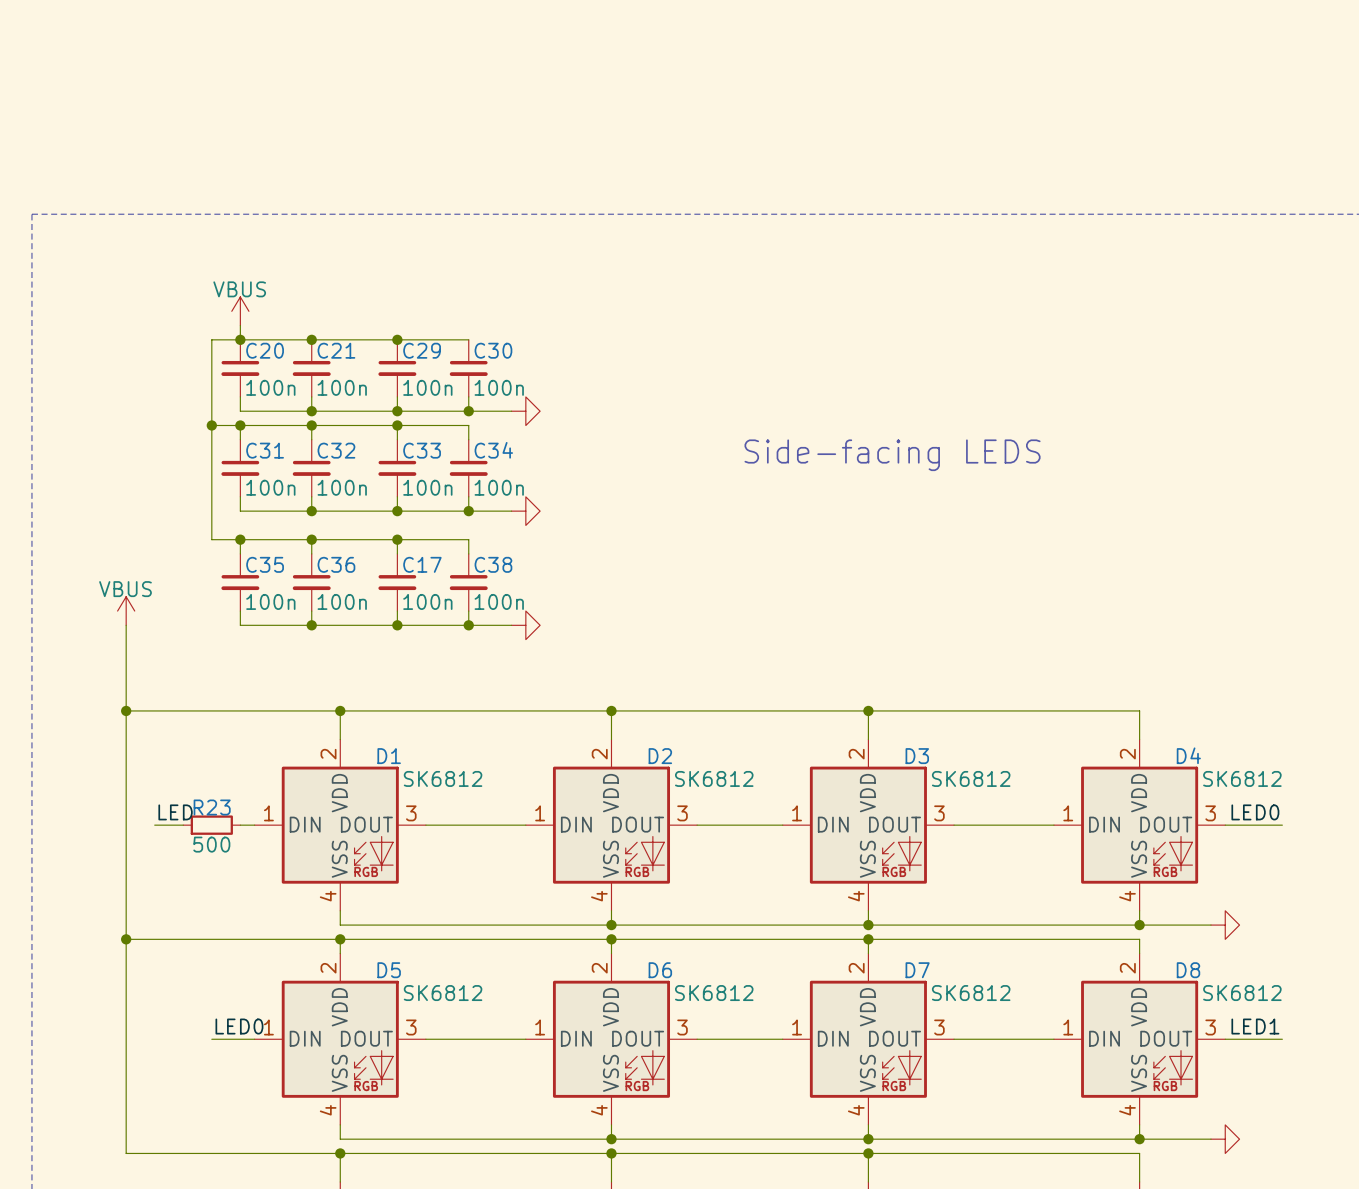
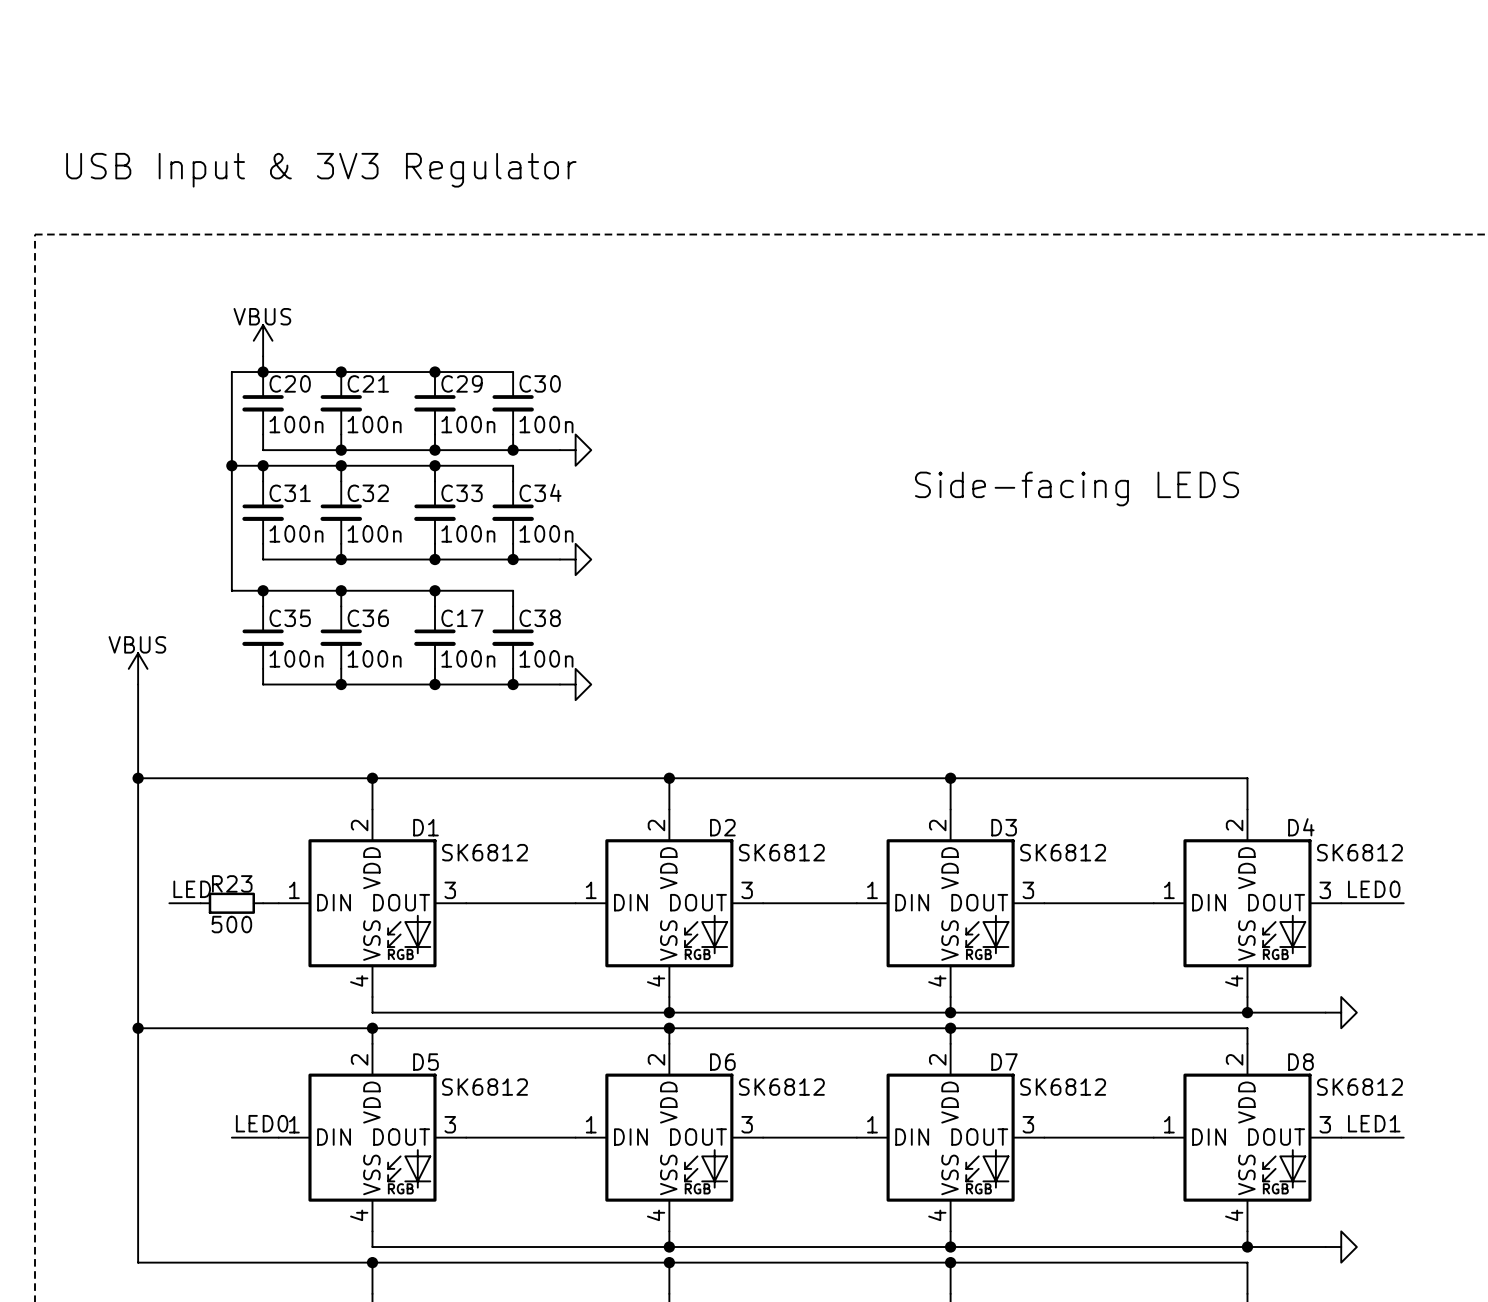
text: none -> USB Input & 3V3 Regulator (321, 170)
text position: Side-facing LEDS (892, 455) -> Side-facing LEDS (1077, 488)

